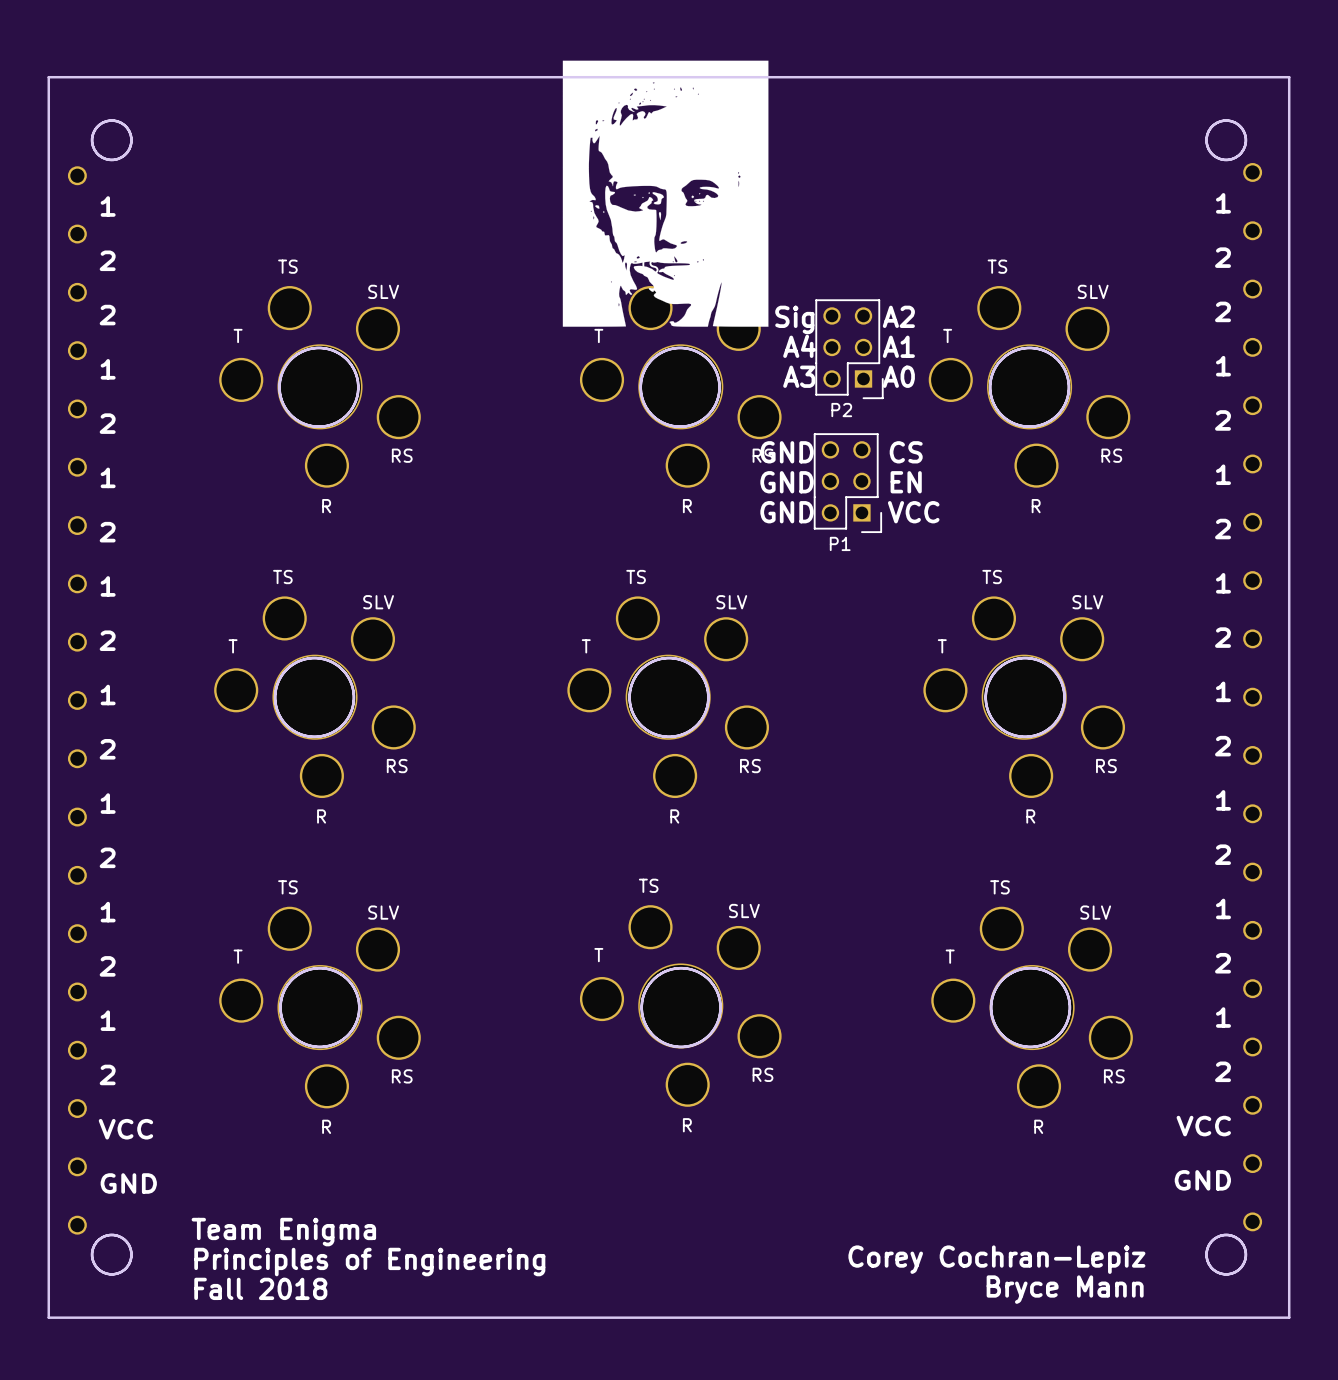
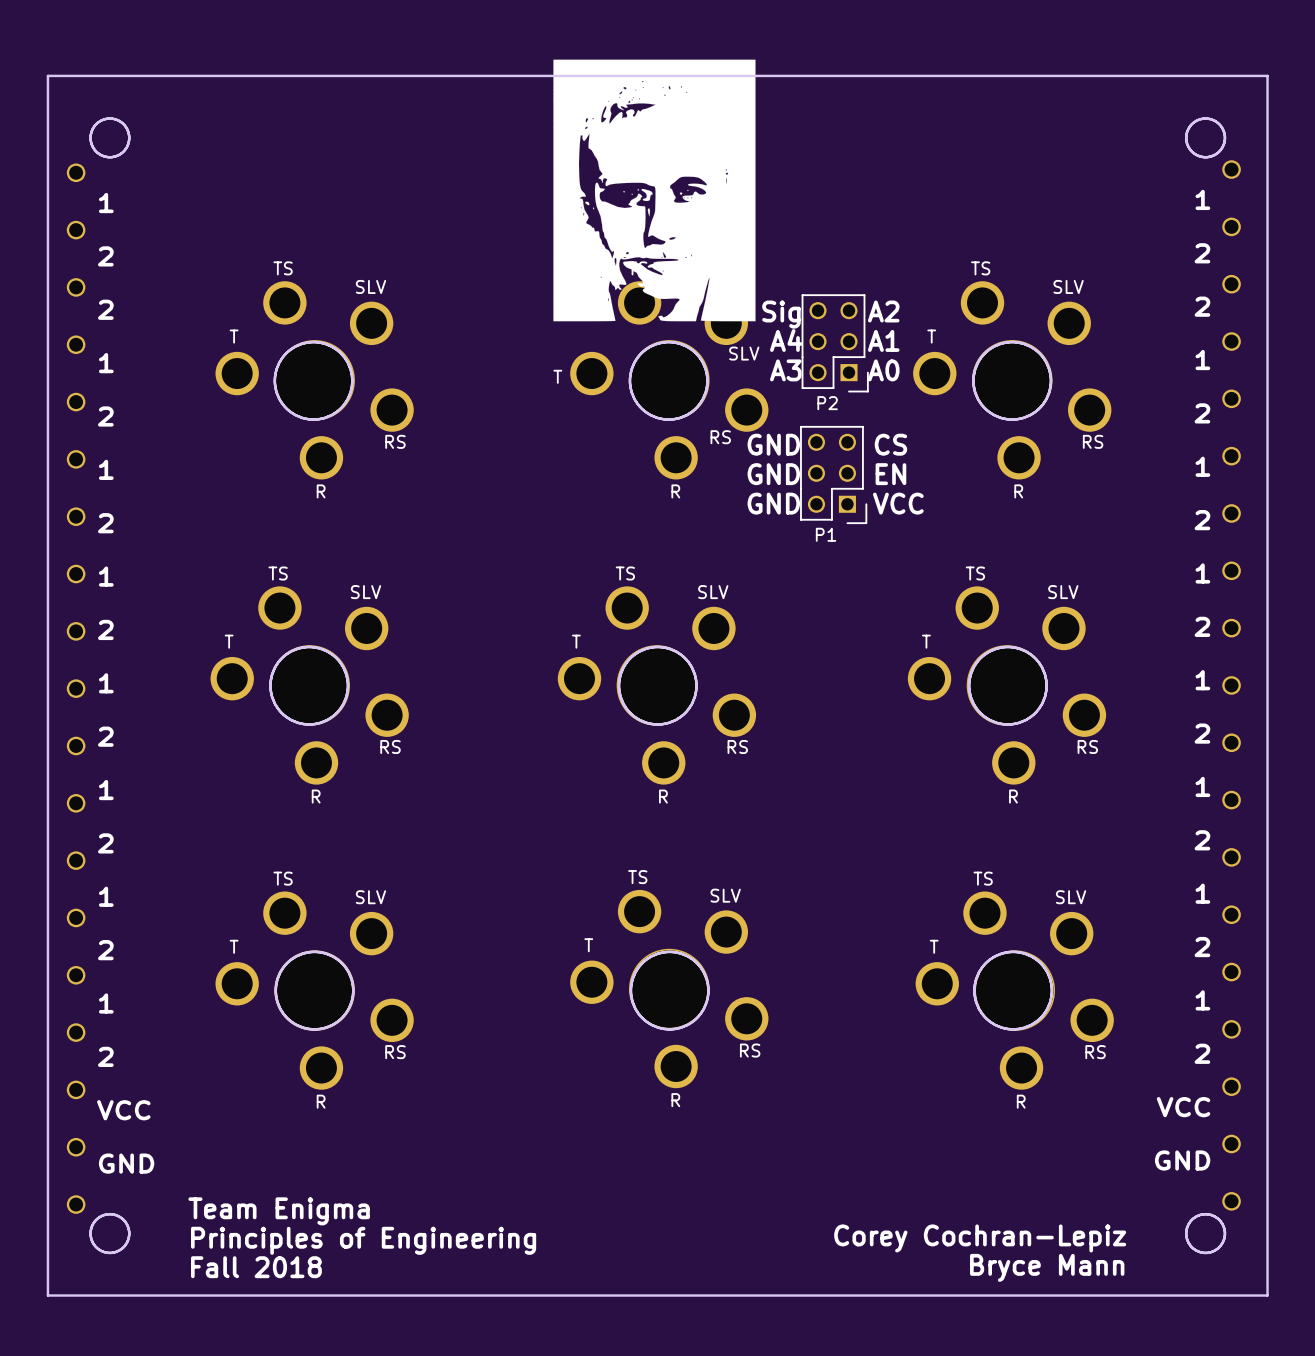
part footprint: [219, 286, 421, 488] -> [215, 281, 414, 480]
part footprint: [579, 286, 782, 488] -> [570, 281, 769, 480]
part footprint: [928, 286, 1131, 488] -> [913, 281, 1112, 480]
part footprint: [214, 596, 416, 799] -> [210, 586, 409, 785]
part footprint: [567, 596, 769, 799] -> [557, 586, 757, 785]
part footprint: [923, 596, 1126, 799] -> [907, 586, 1107, 785]
part footprint: [579, 905, 782, 1107] -> [570, 889, 769, 1089]
part footprint: [219, 906, 421, 1109] -> [215, 891, 414, 1090]
part footprint: [931, 906, 1133, 1109] -> [915, 891, 1114, 1090]

